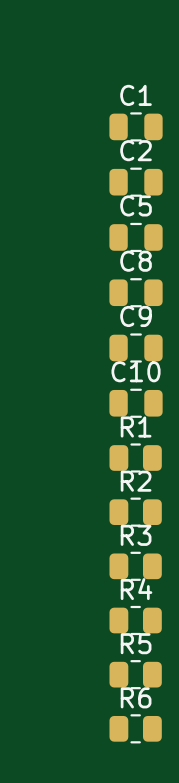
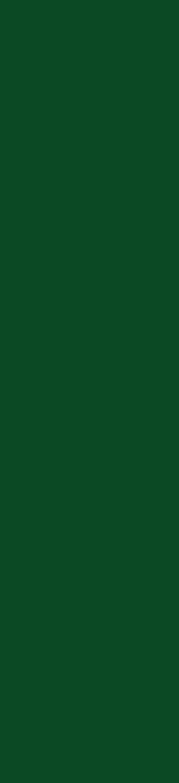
C1: (136, 126) -> none
C2: (136, 182) -> none
C5: (136, 237) -> none
C8: (136, 292) -> none
C9: (136, 348) -> none
C10: (136, 403) -> none
R1: (135, 457) -> none
R2: (135, 512) -> none
R3: (135, 566) -> none
R4: (135, 620) -> none
R5: (135, 674) -> none
R6: (135, 728) -> none

